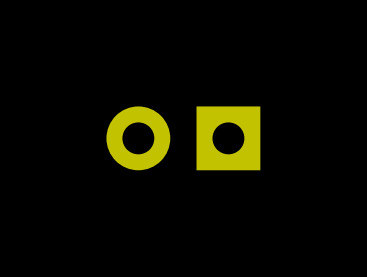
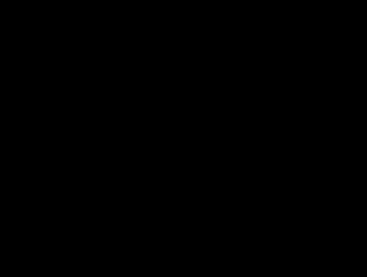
part: (183, 138) -> none

